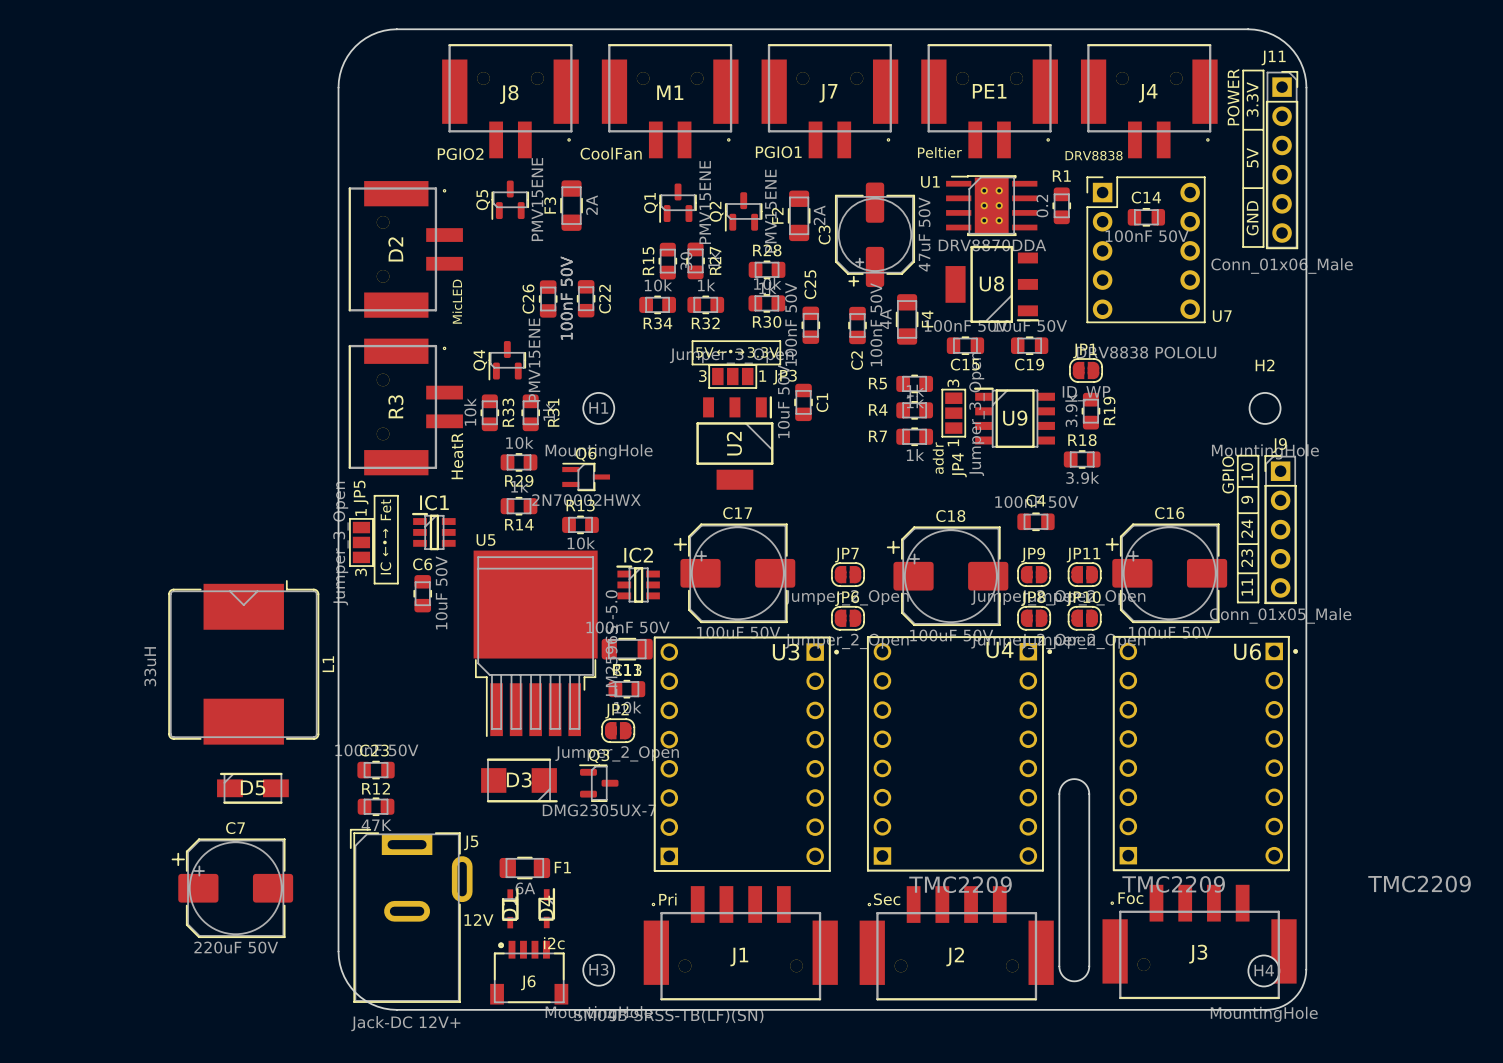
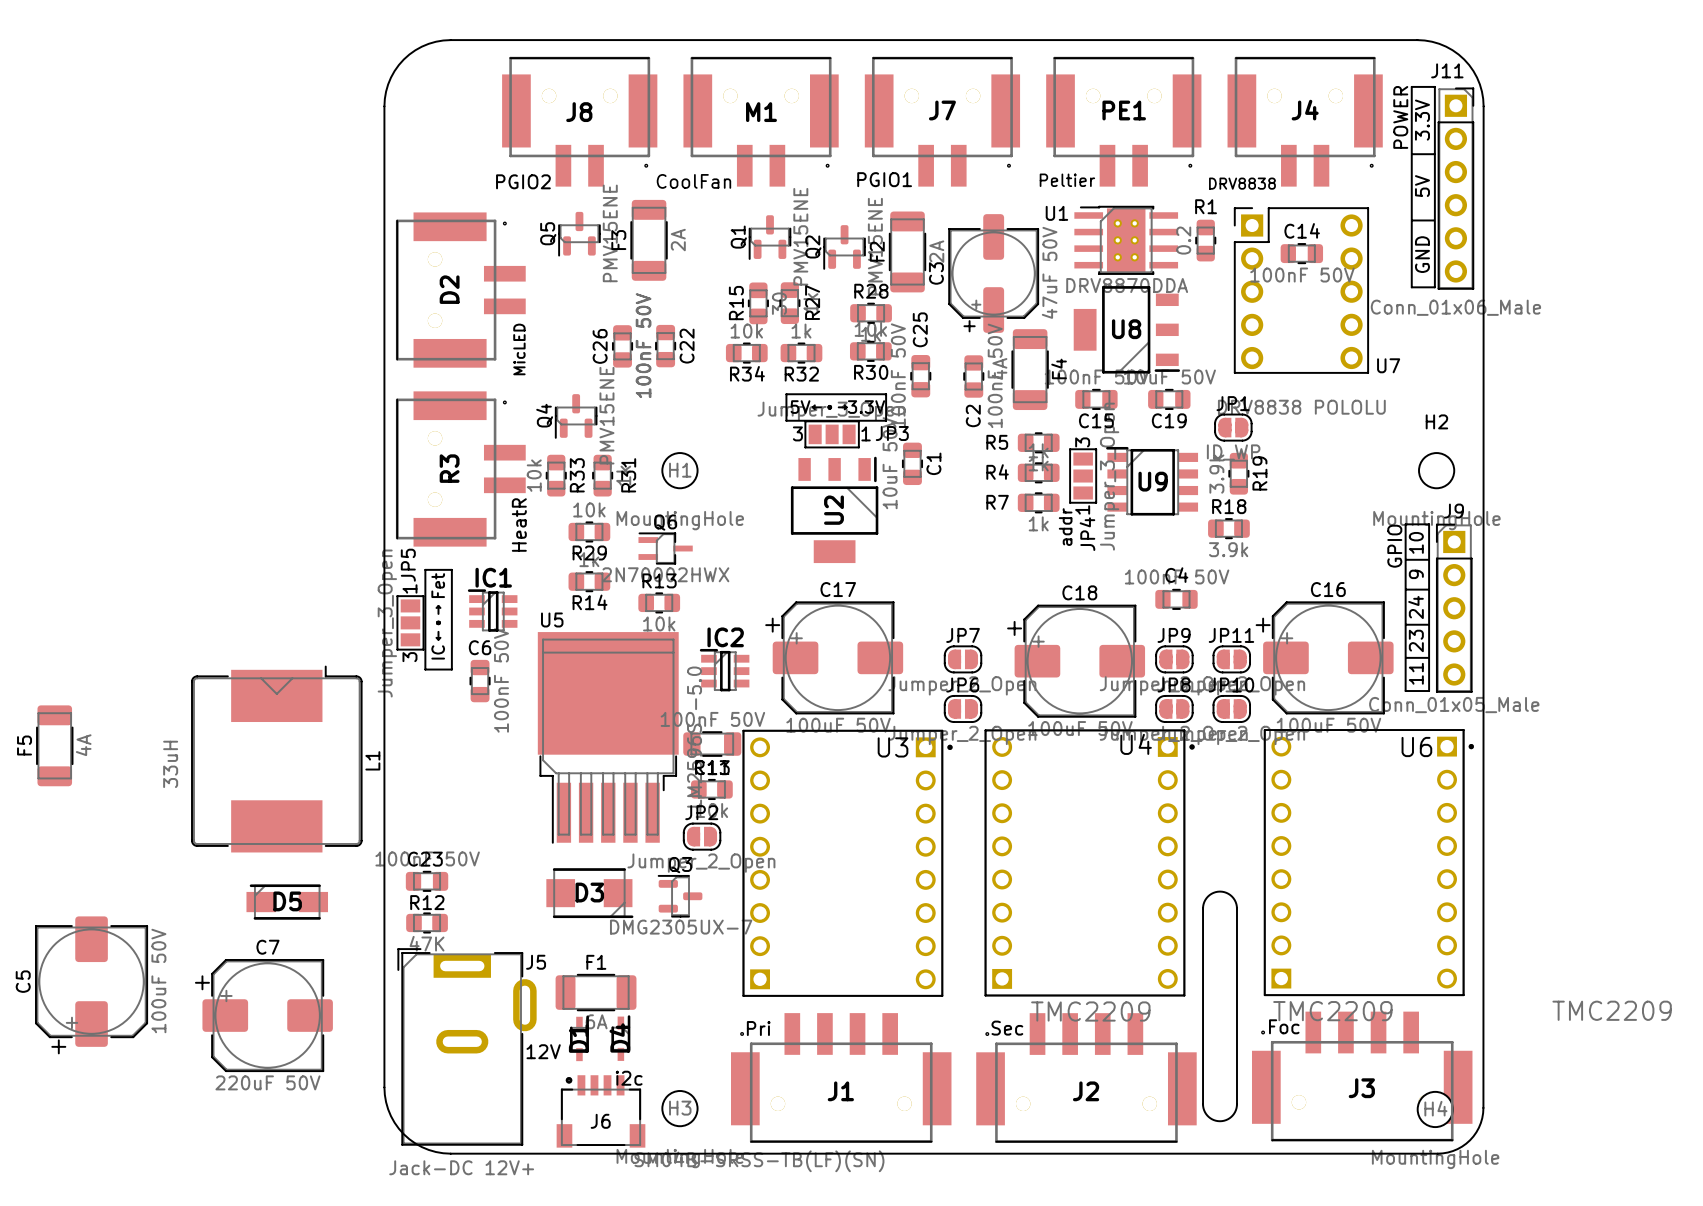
F3 footprint: [560, 180, 583, 231] -> [630, 199, 668, 281]
F2 footprint: [787, 190, 811, 242] -> [888, 211, 927, 293]
F4 footprint: [895, 294, 919, 345] -> [1011, 329, 1049, 411]
C6 value: 10uF 50V (441, 592) -> 100nF 50V (501, 680)
F5: none -> 4A (54, 745)
F1 footprint: [499, 856, 551, 880] -> [555, 974, 637, 1012]
C5: none -> 100uF 50V (91, 985)
F1 name position: F1 (562, 867) -> F1 (596, 962)

